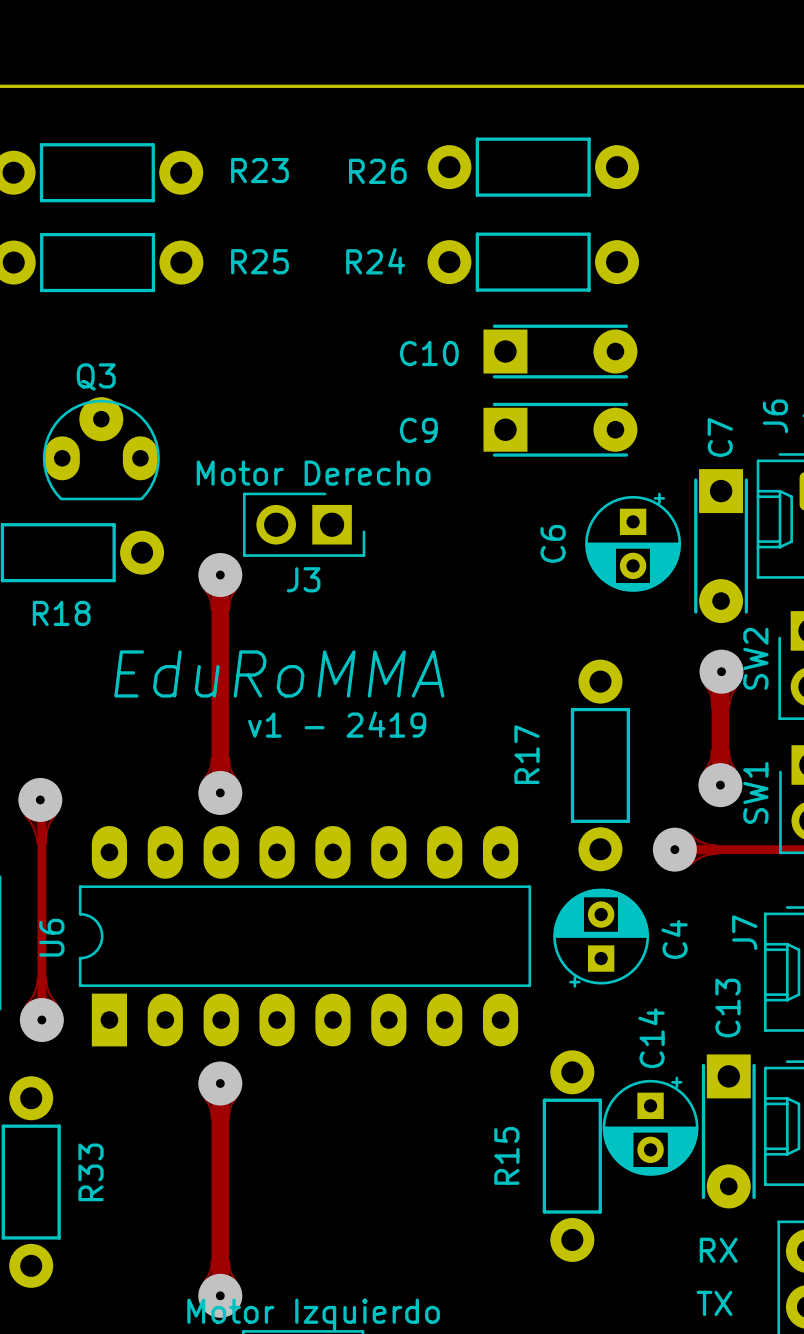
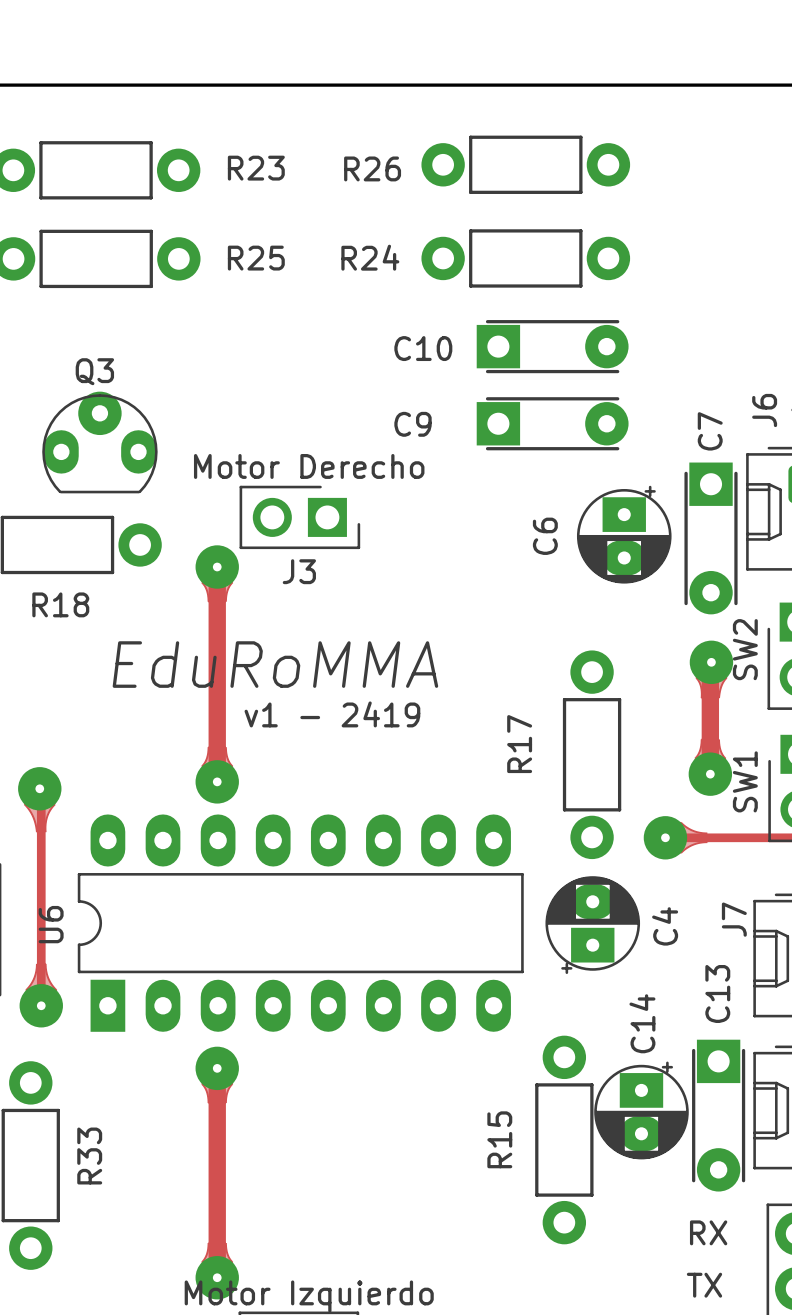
C6 footprint: [585, 492, 682, 592] -> [576, 485, 672, 584]
C4 footprint: [553, 888, 650, 988] -> [545, 876, 641, 975]
C14 footprint: [602, 1076, 699, 1176] -> [594, 1061, 689, 1160]

